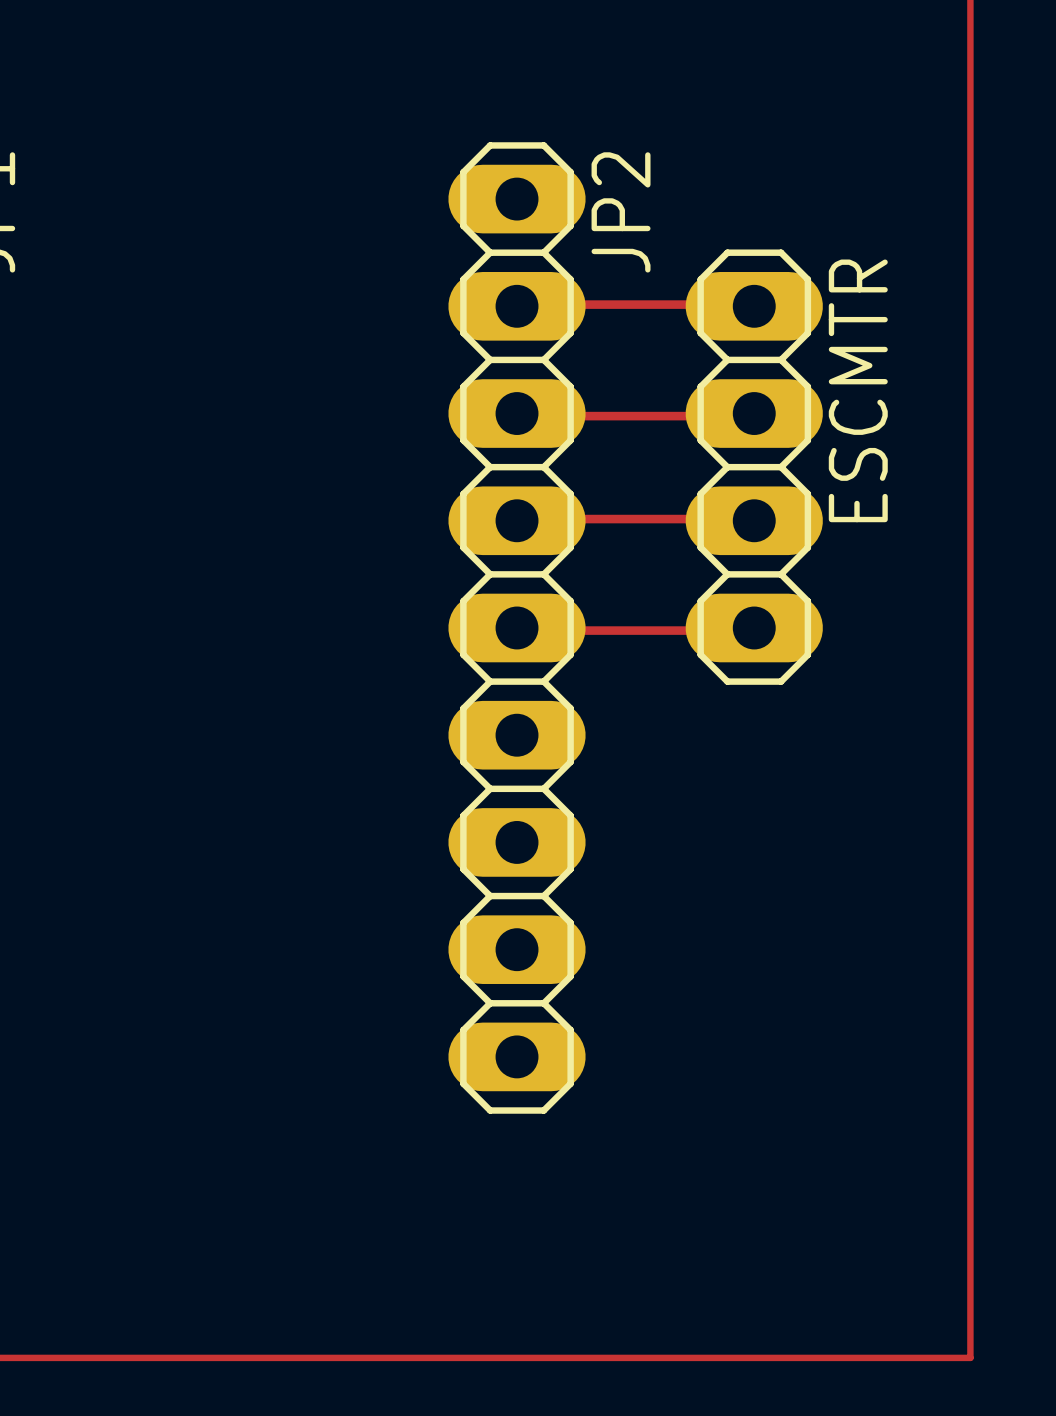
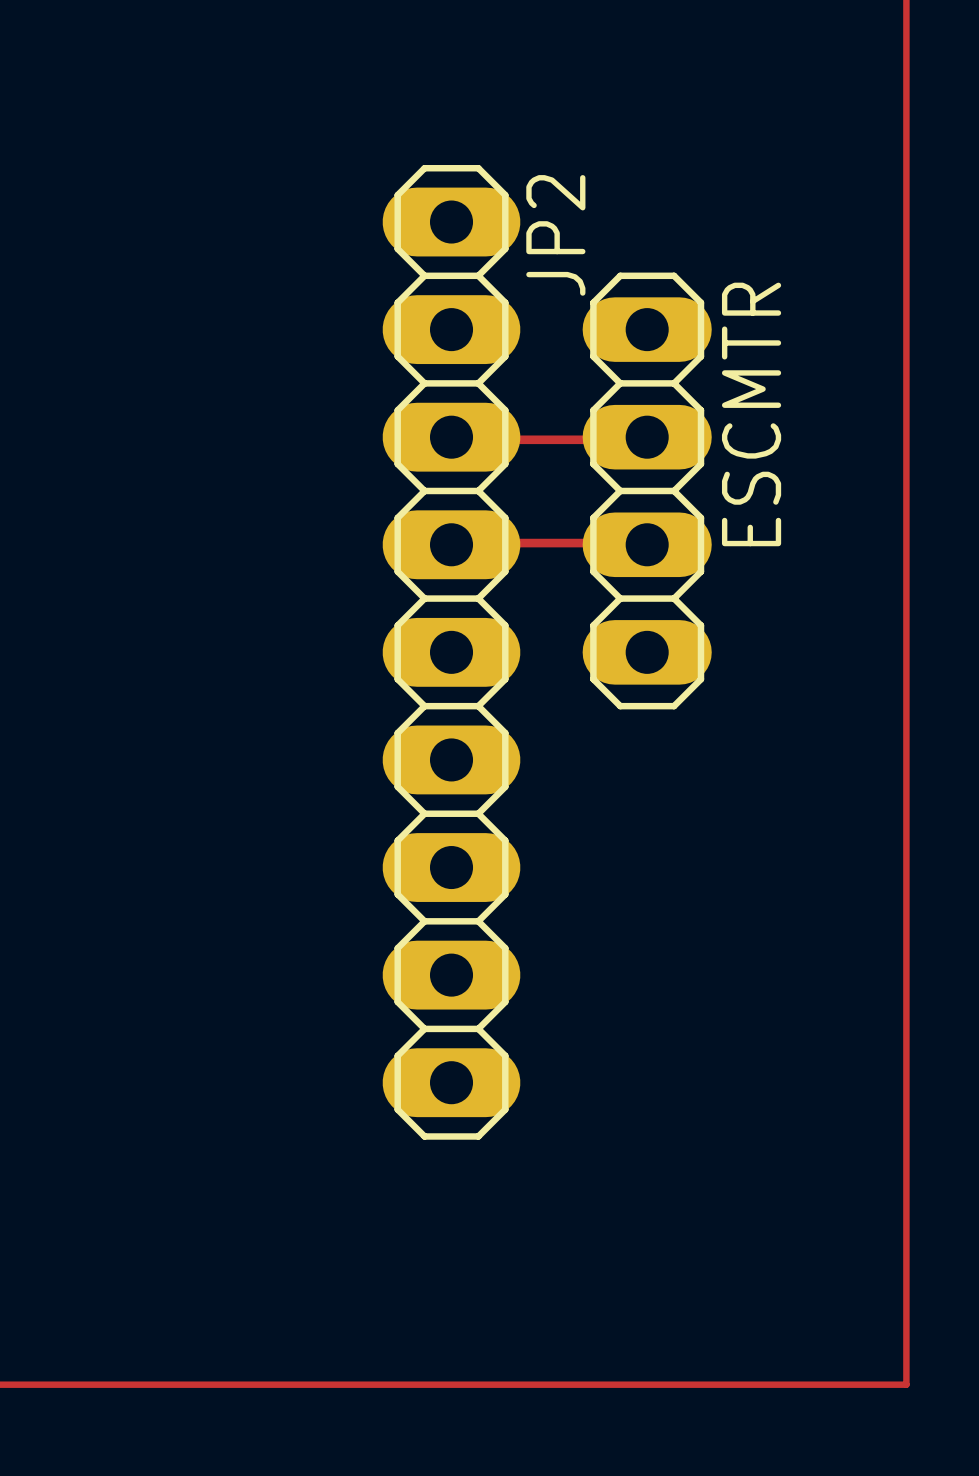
ESCMTR footprint: [685, 249, 823, 685] -> [582, 272, 712, 710]
track: (517, 306) (525, 304) (748, 304) (754, 306) -> none
track: (517, 627) (525, 630) (748, 630) (754, 627) -> none

